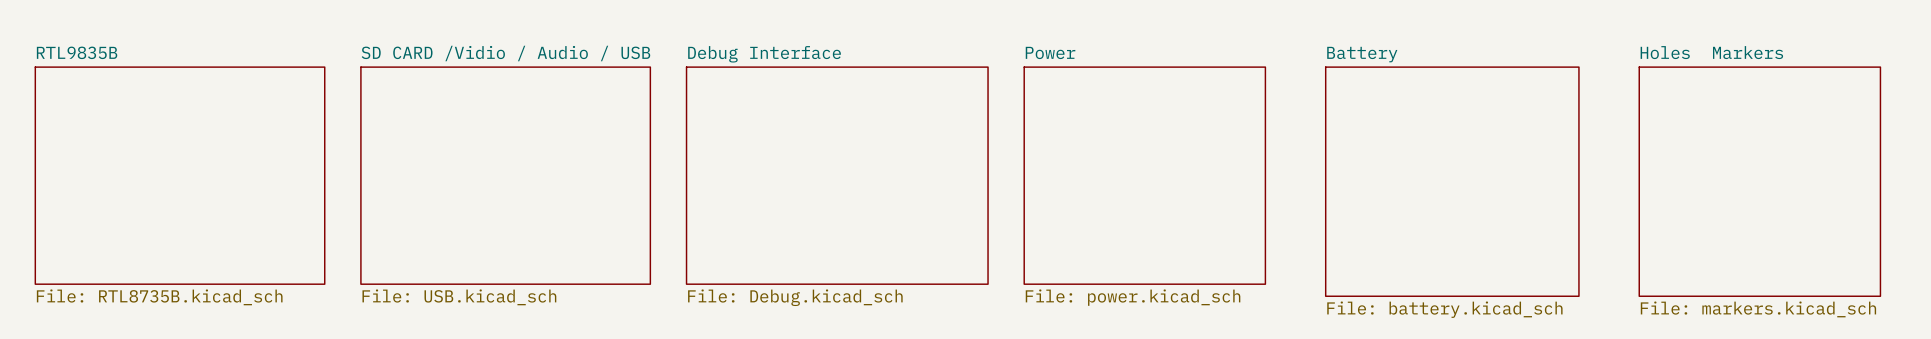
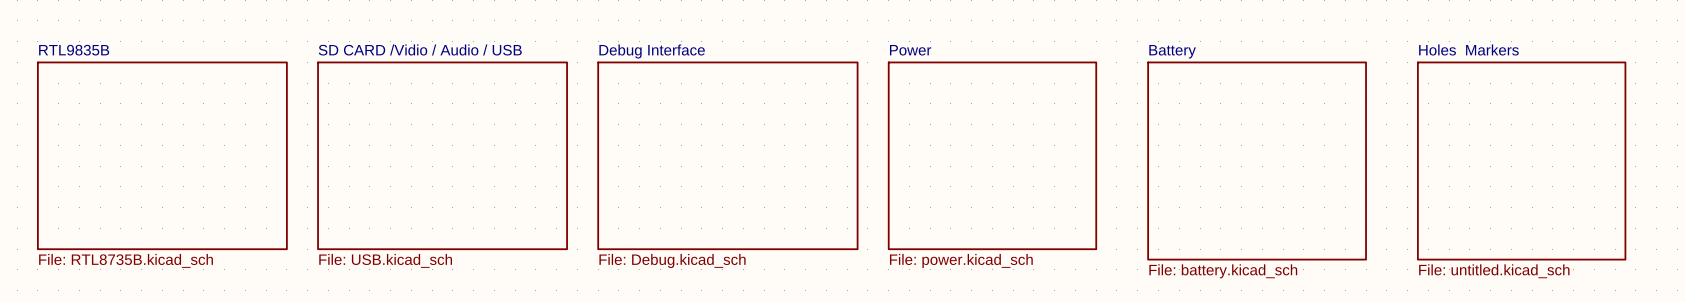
sheet Holes Markers value: File: markers.kicad_sch (1758, 309) -> File: untitled.kicad_sch (1494, 271)

